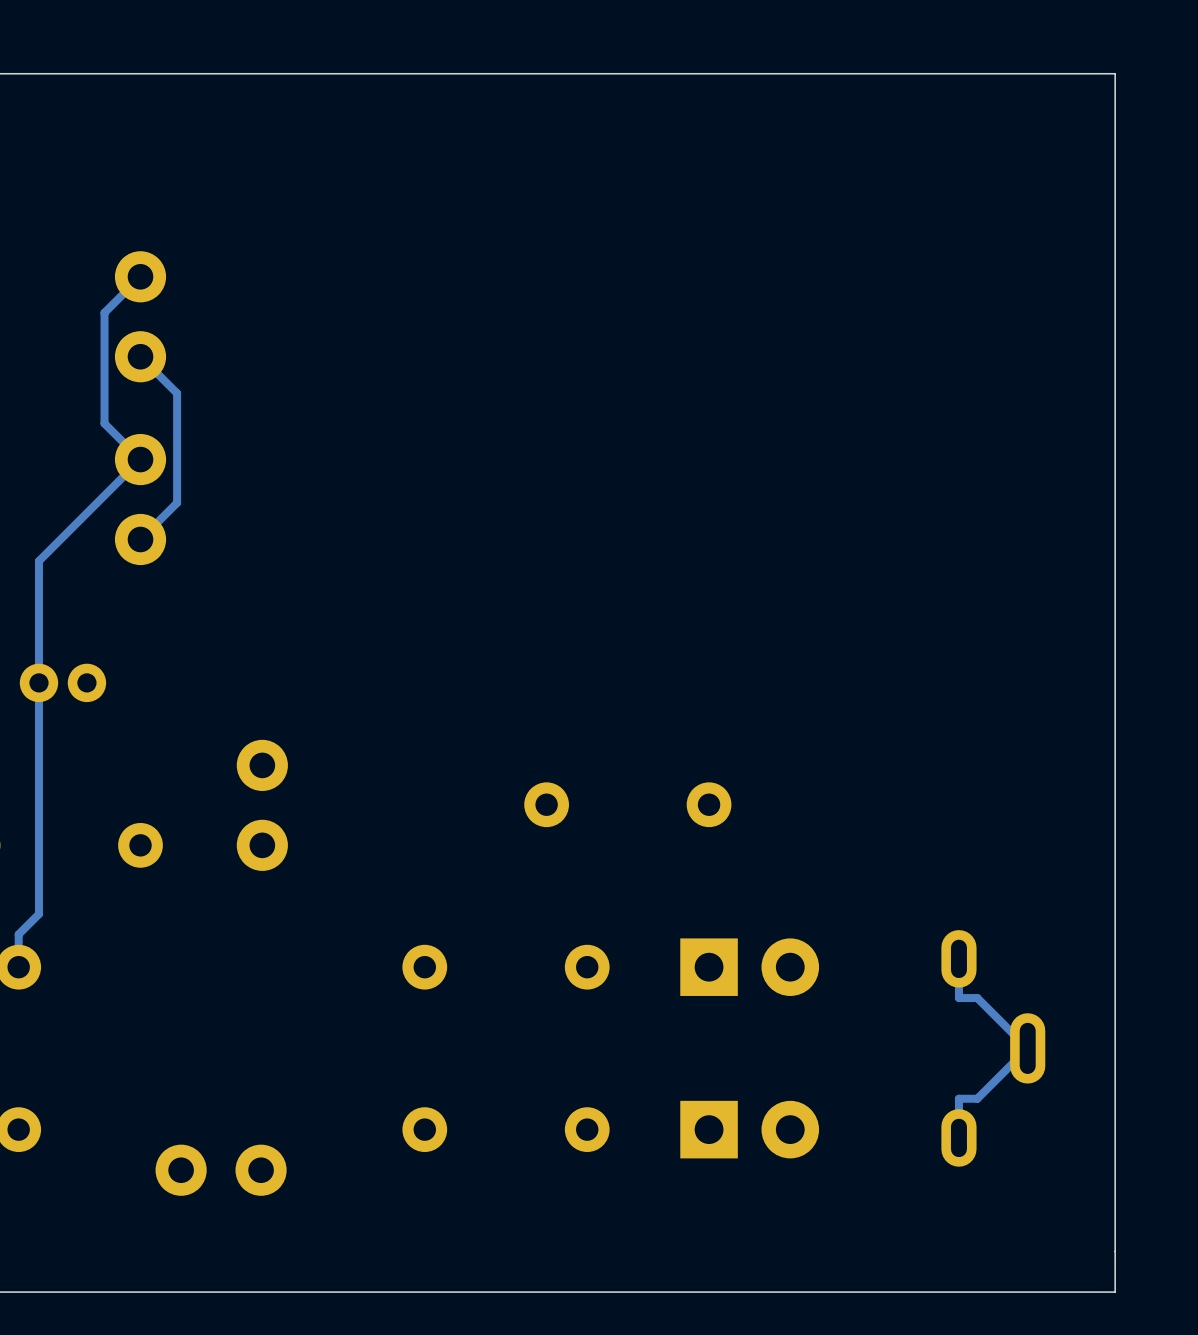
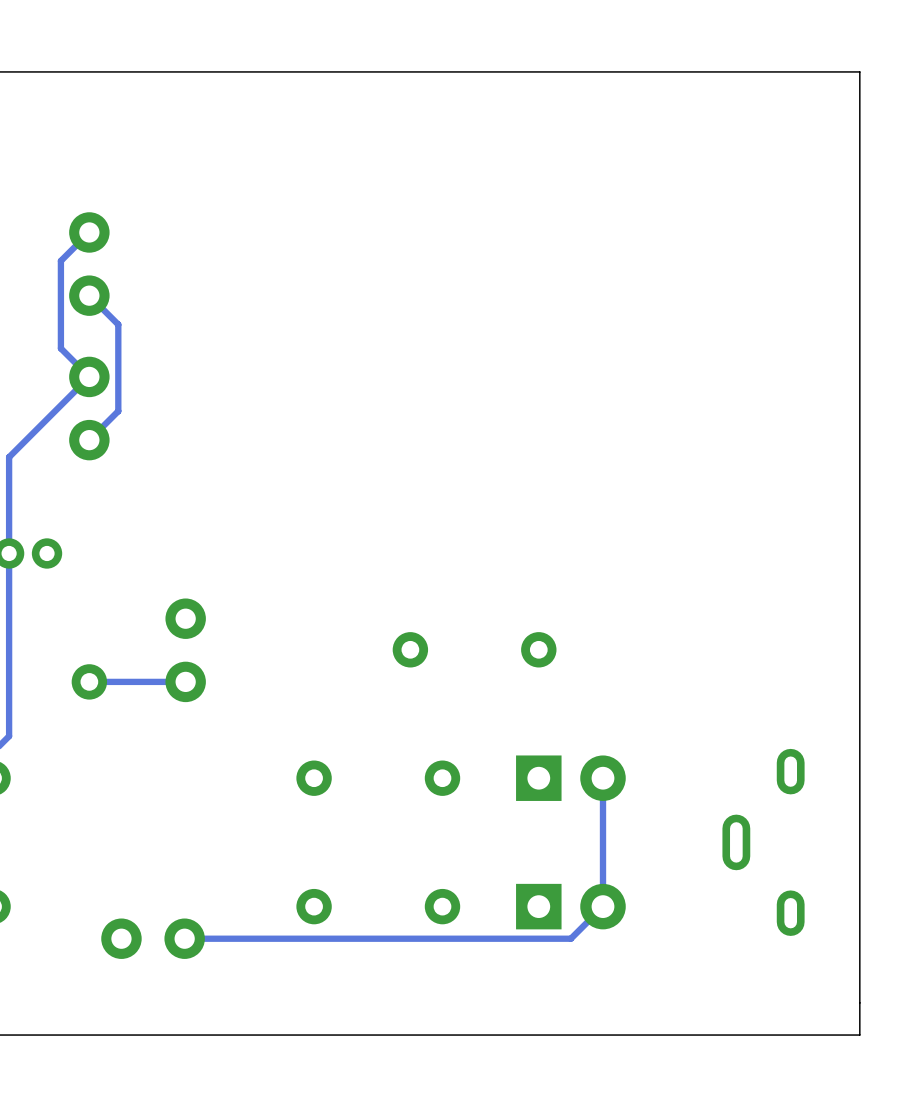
track: none -> (185, 681) (89, 681)
track: (958, 958) (958, 998) (977, 998) (1027, 1048) (977, 1098) (958, 1098) (958, 1137) -> none
track: none -> (603, 778) (603, 906) (570, 938) (184, 938)
part rotation: 0° (993, 1048) -> 180° (763, 842)

